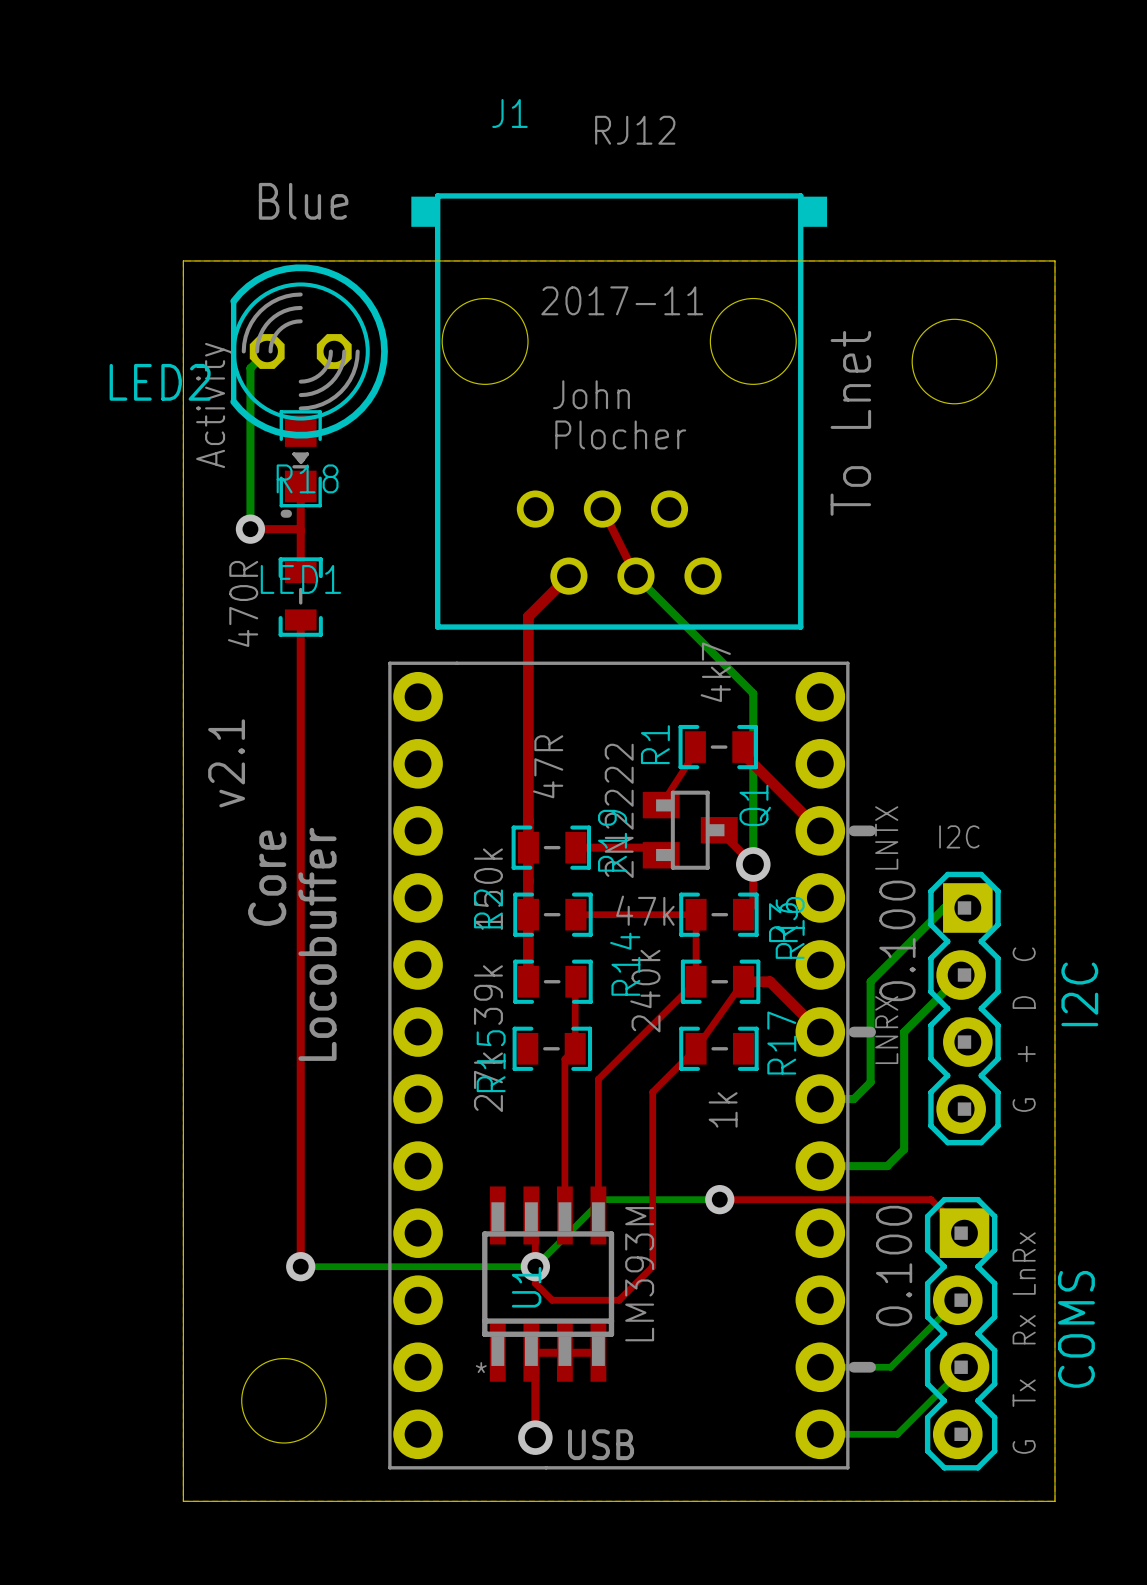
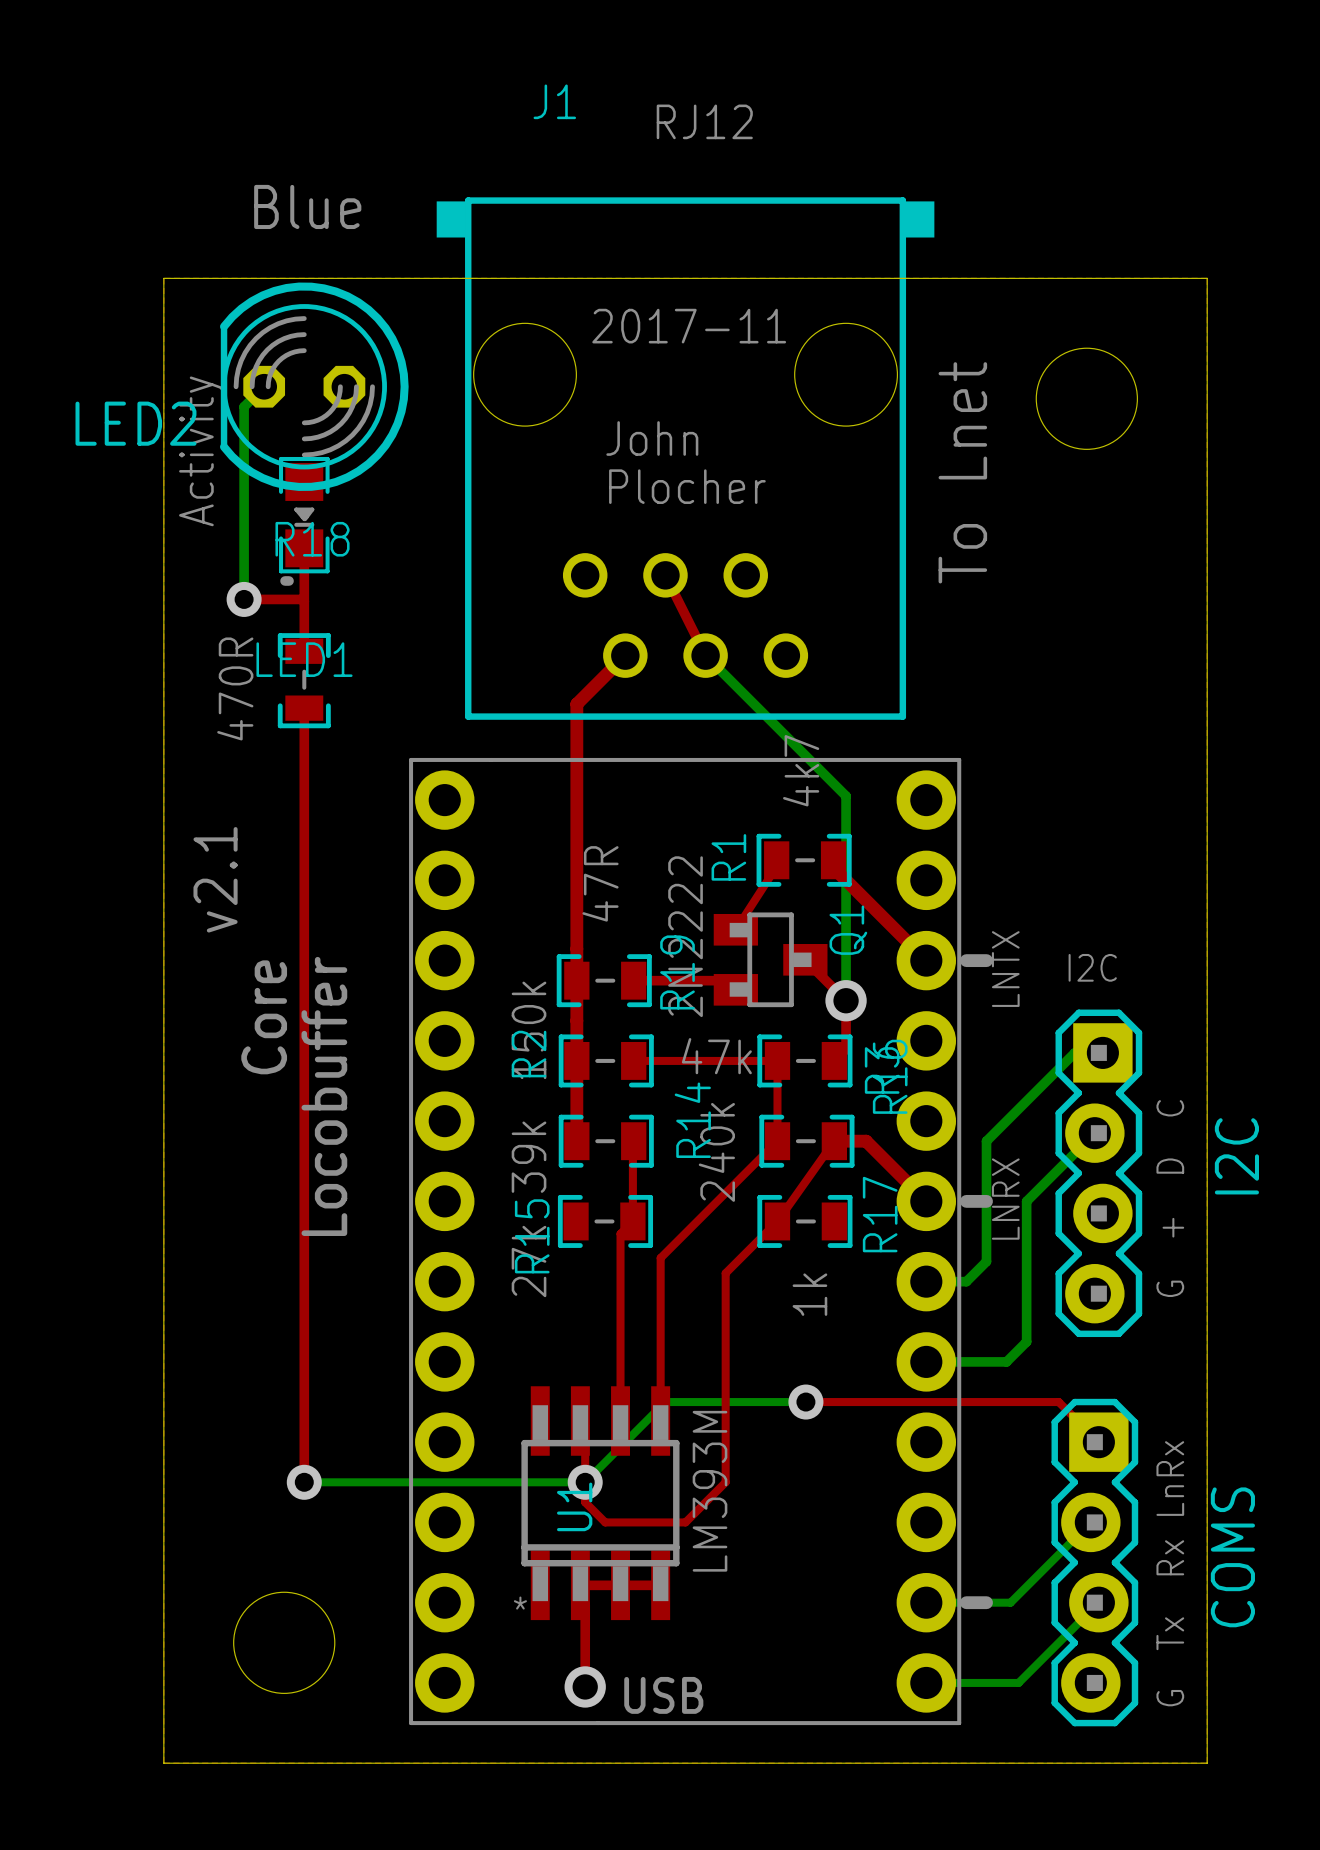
I2C value: 0.100 (897, 940) -> none
COMS value: 0.100 (894, 1266) -> none

